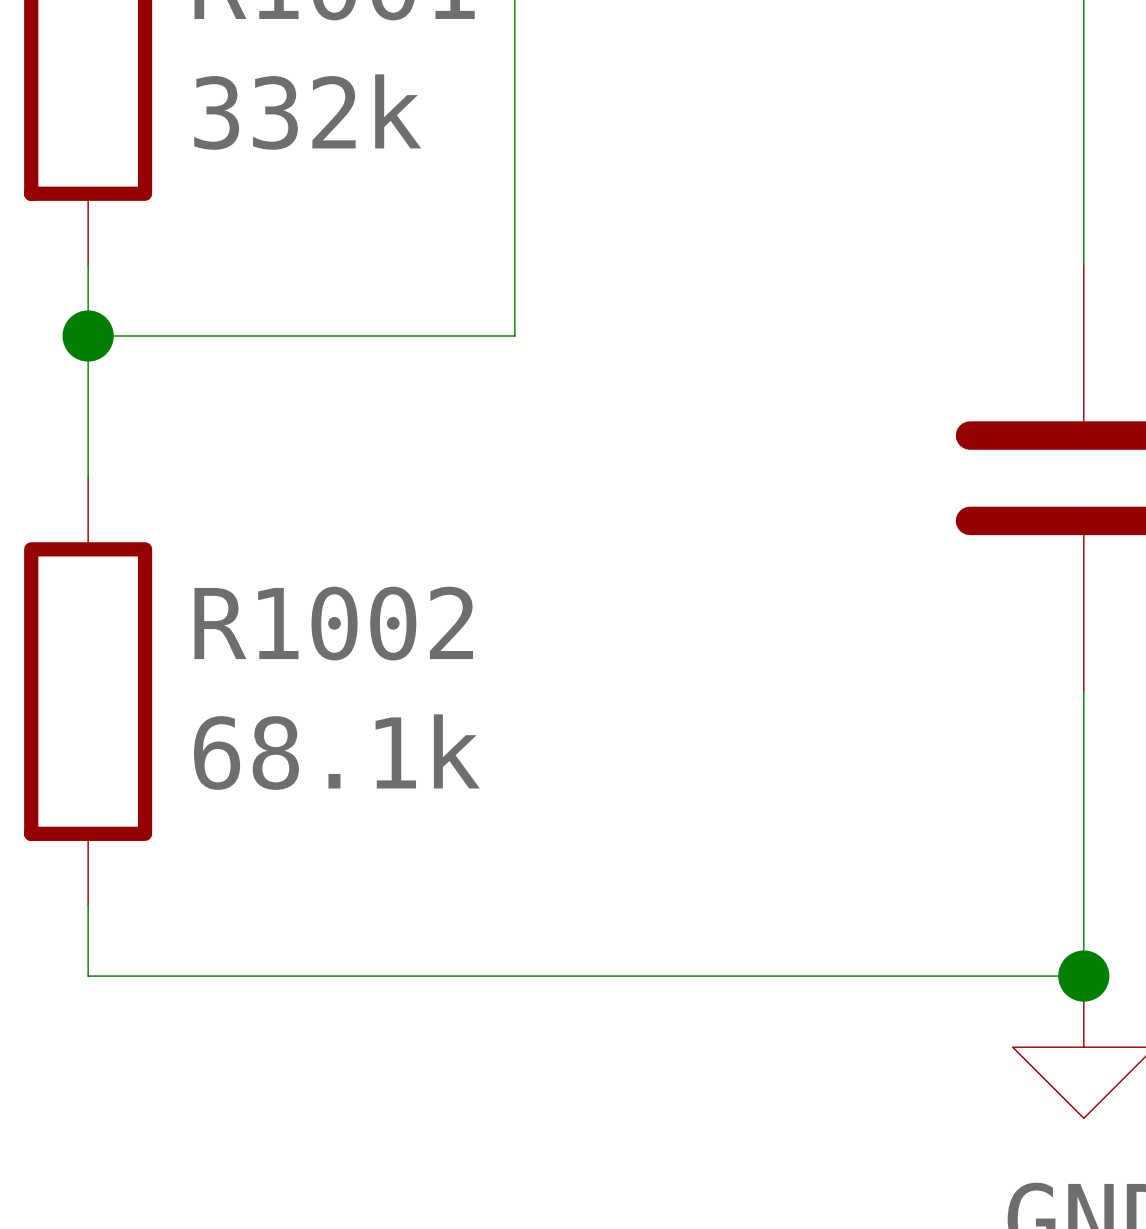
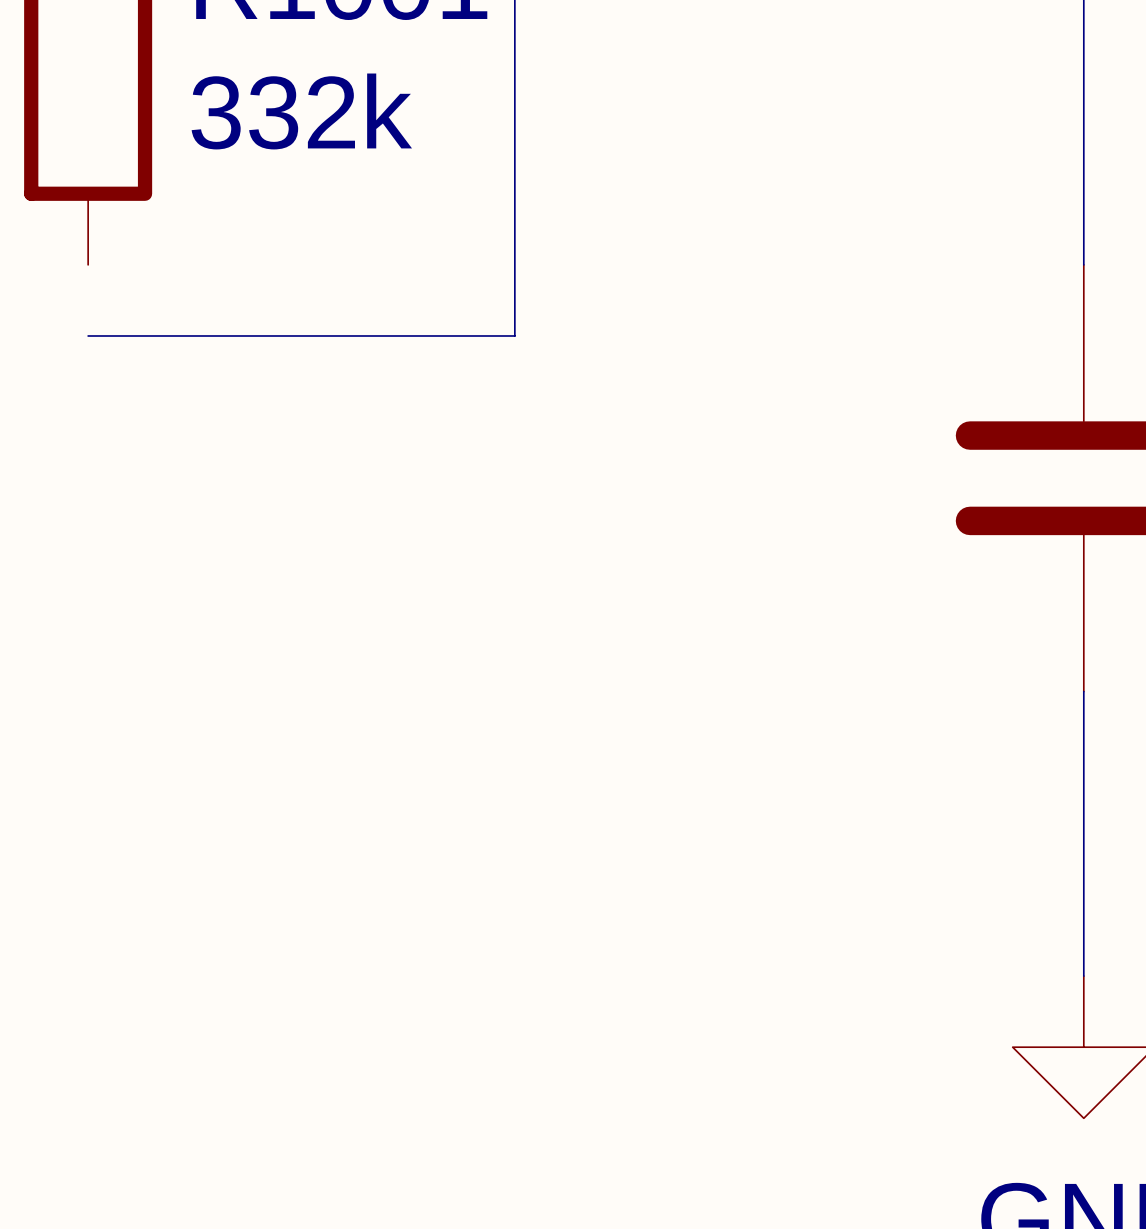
wire: (88, 264) (88, 478) -> none
junction: (88, 335) -> none
R1002: 68.1k (88, 691) -> none
wire: (88, 904) (88, 976) (1083, 976) -> none
junction: (1083, 976) -> none

